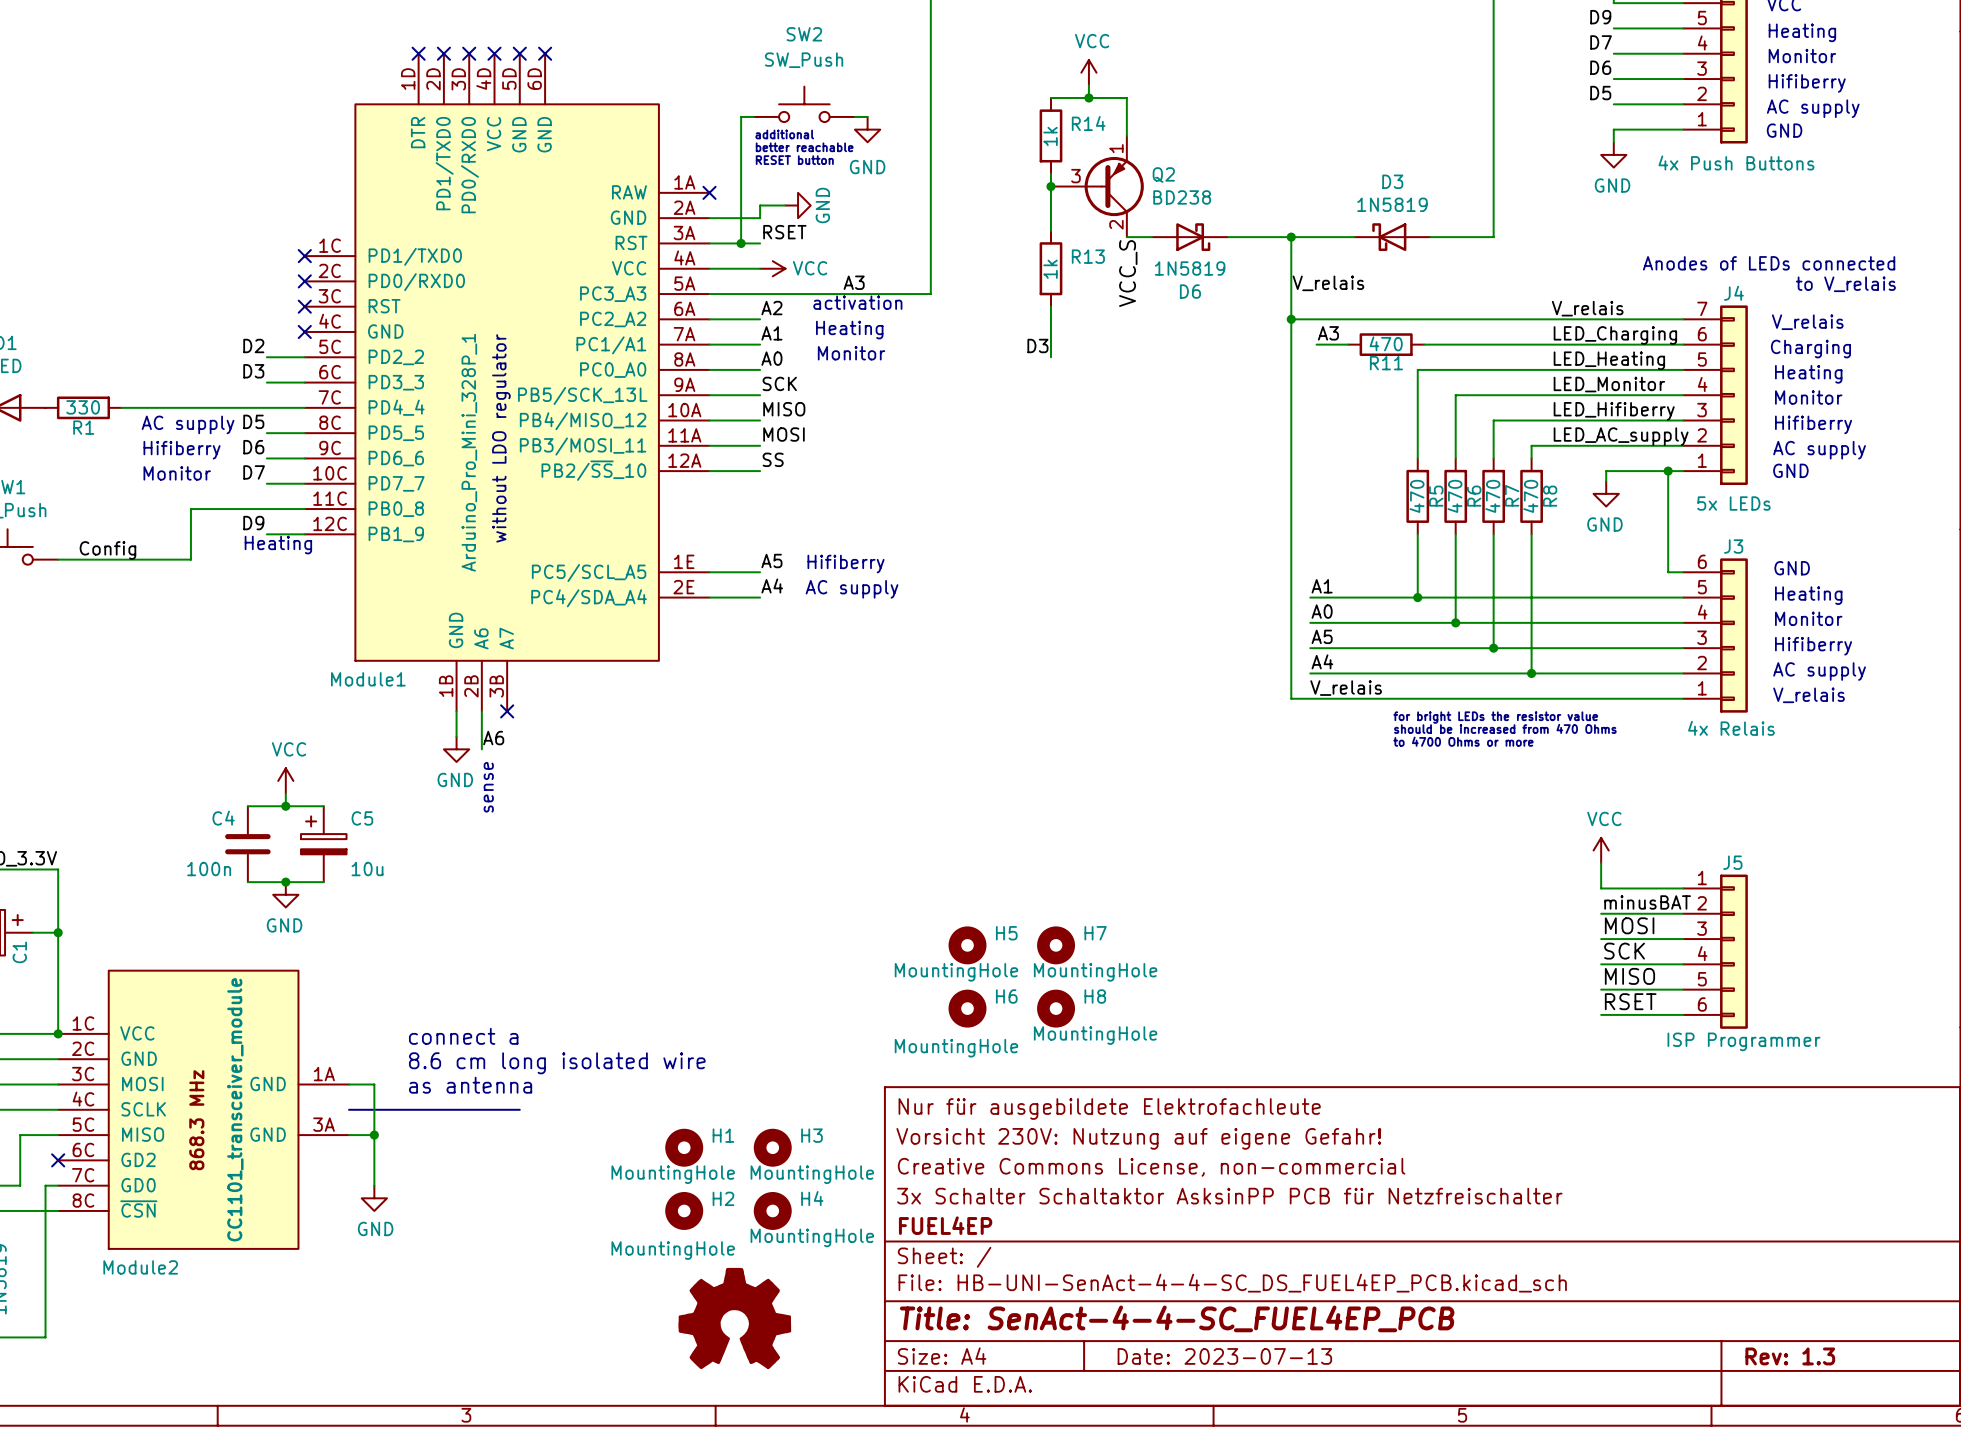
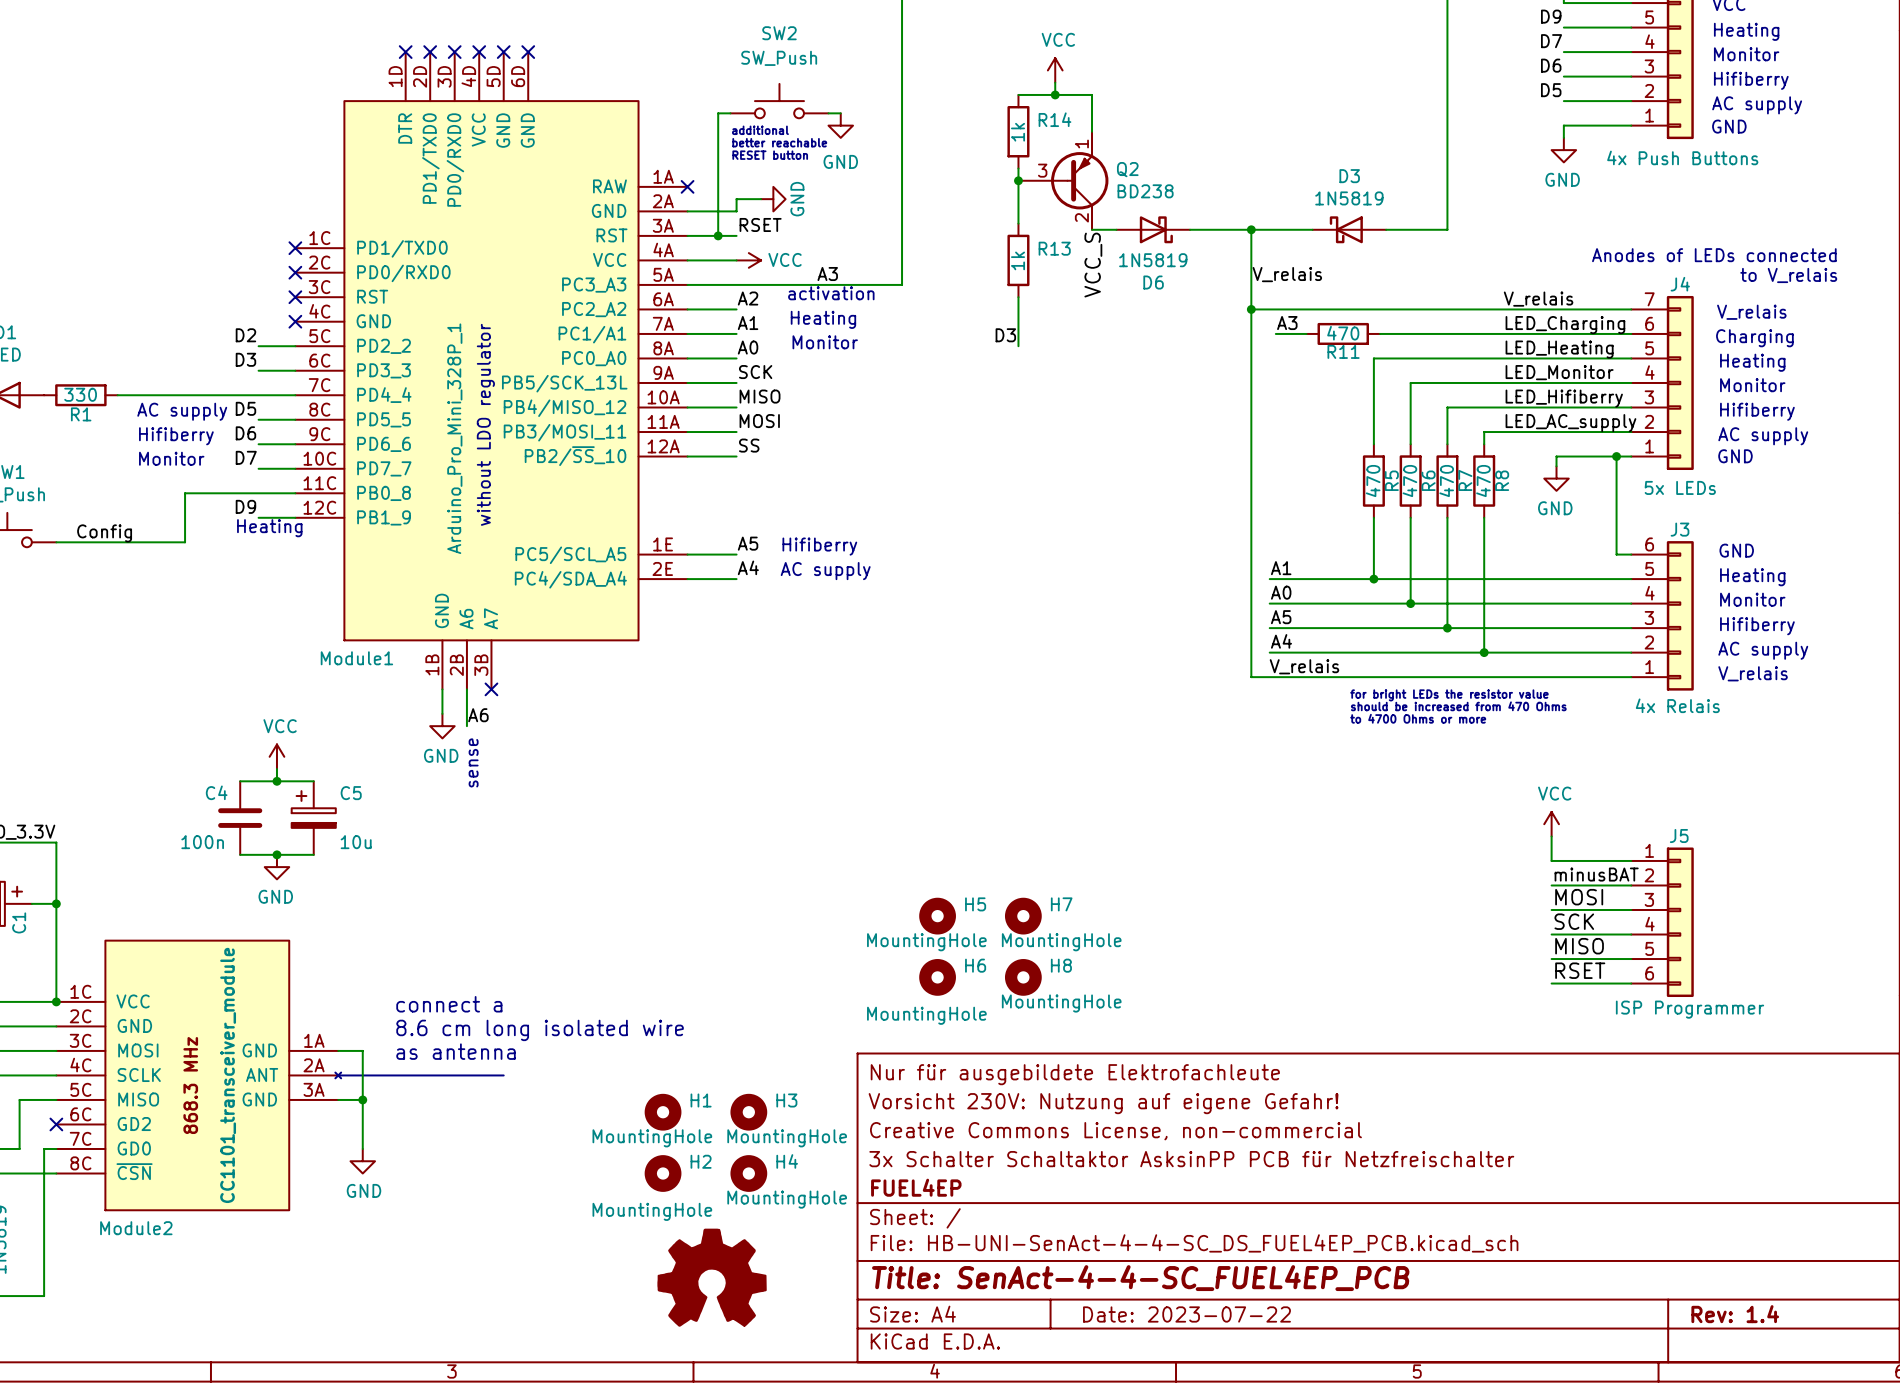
Module2 symbol: [58, 970, 350, 1249] -> [56, 940, 342, 1211]
title block: Date: 2023-07-13 (1224, 1356) -> Date: 2023-07-22 (1186, 1314)
title block: Rev: 1.3 (1790, 1356) -> Rev: 1.4 (1735, 1314)

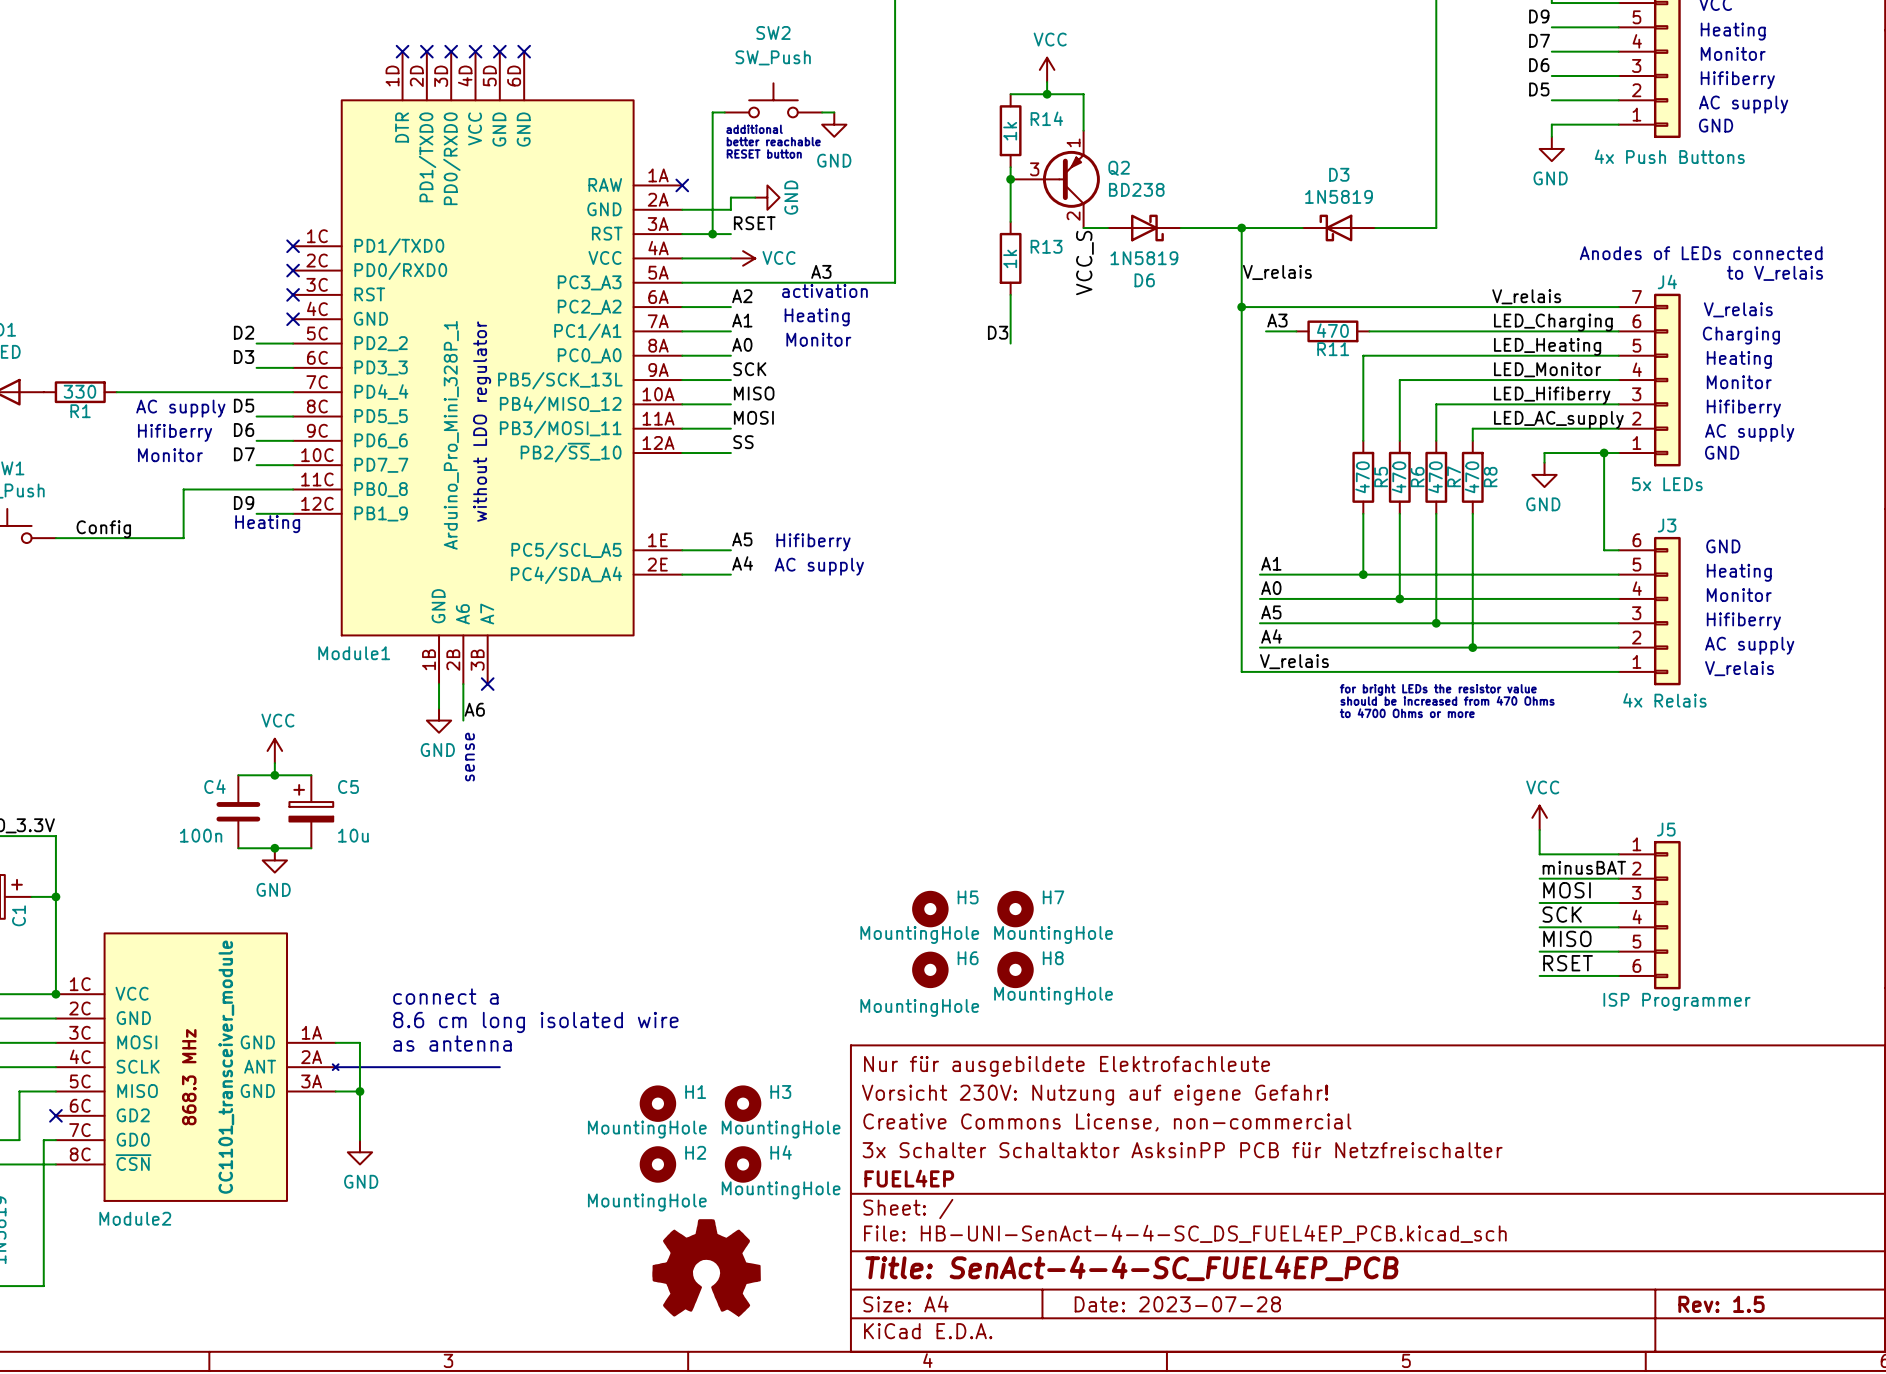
title block: Date: 2023-07-22 (1186, 1314) -> Date: 2023-07-28 (1177, 1304)
title block: Rev: 1.4 (1735, 1314) -> Rev: 1.5 (1721, 1304)

